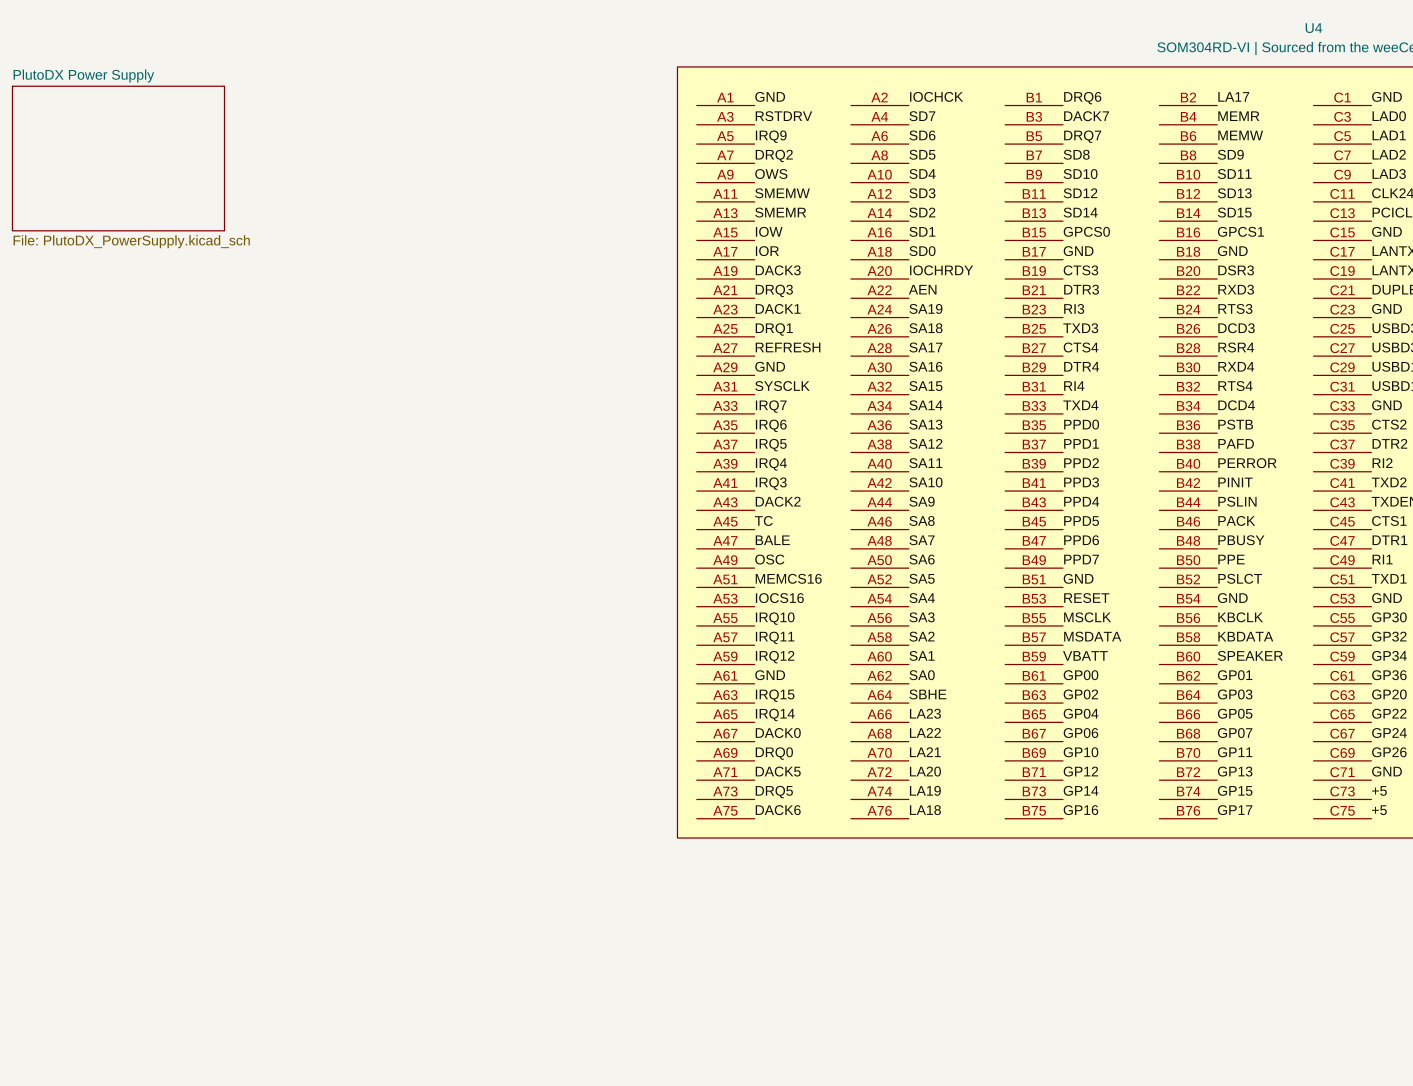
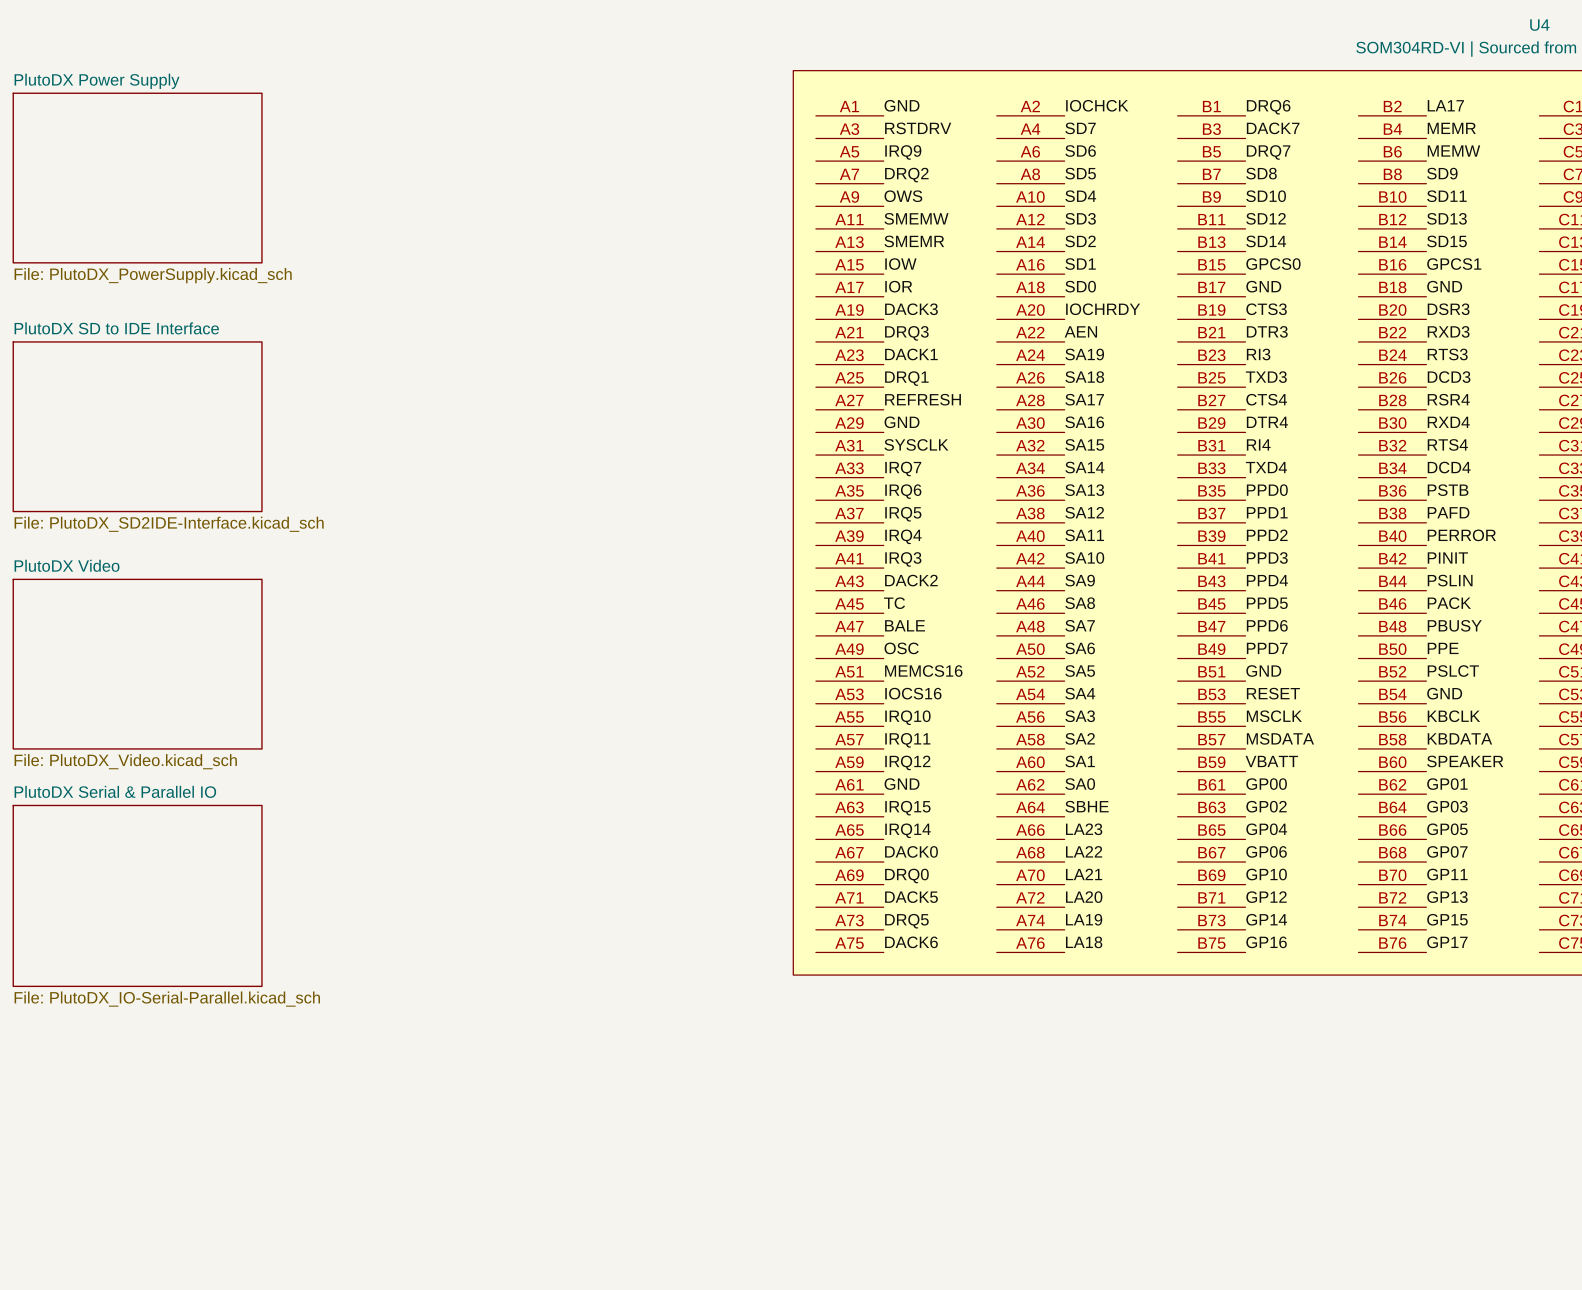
sheet PlutoDX SD to IDE Interface: none -> File: PlutoDX_SD2IDE-Interface.kicad_sch (137, 426)
sheet PlutoDX Video: none -> File: PlutoDX_Video.kicad_sch (137, 664)
sheet PlutoDX Serial & Parallel IO: none -> File: PlutoDX_IO-Serial-Parallel.kicad_sch (137, 895)

